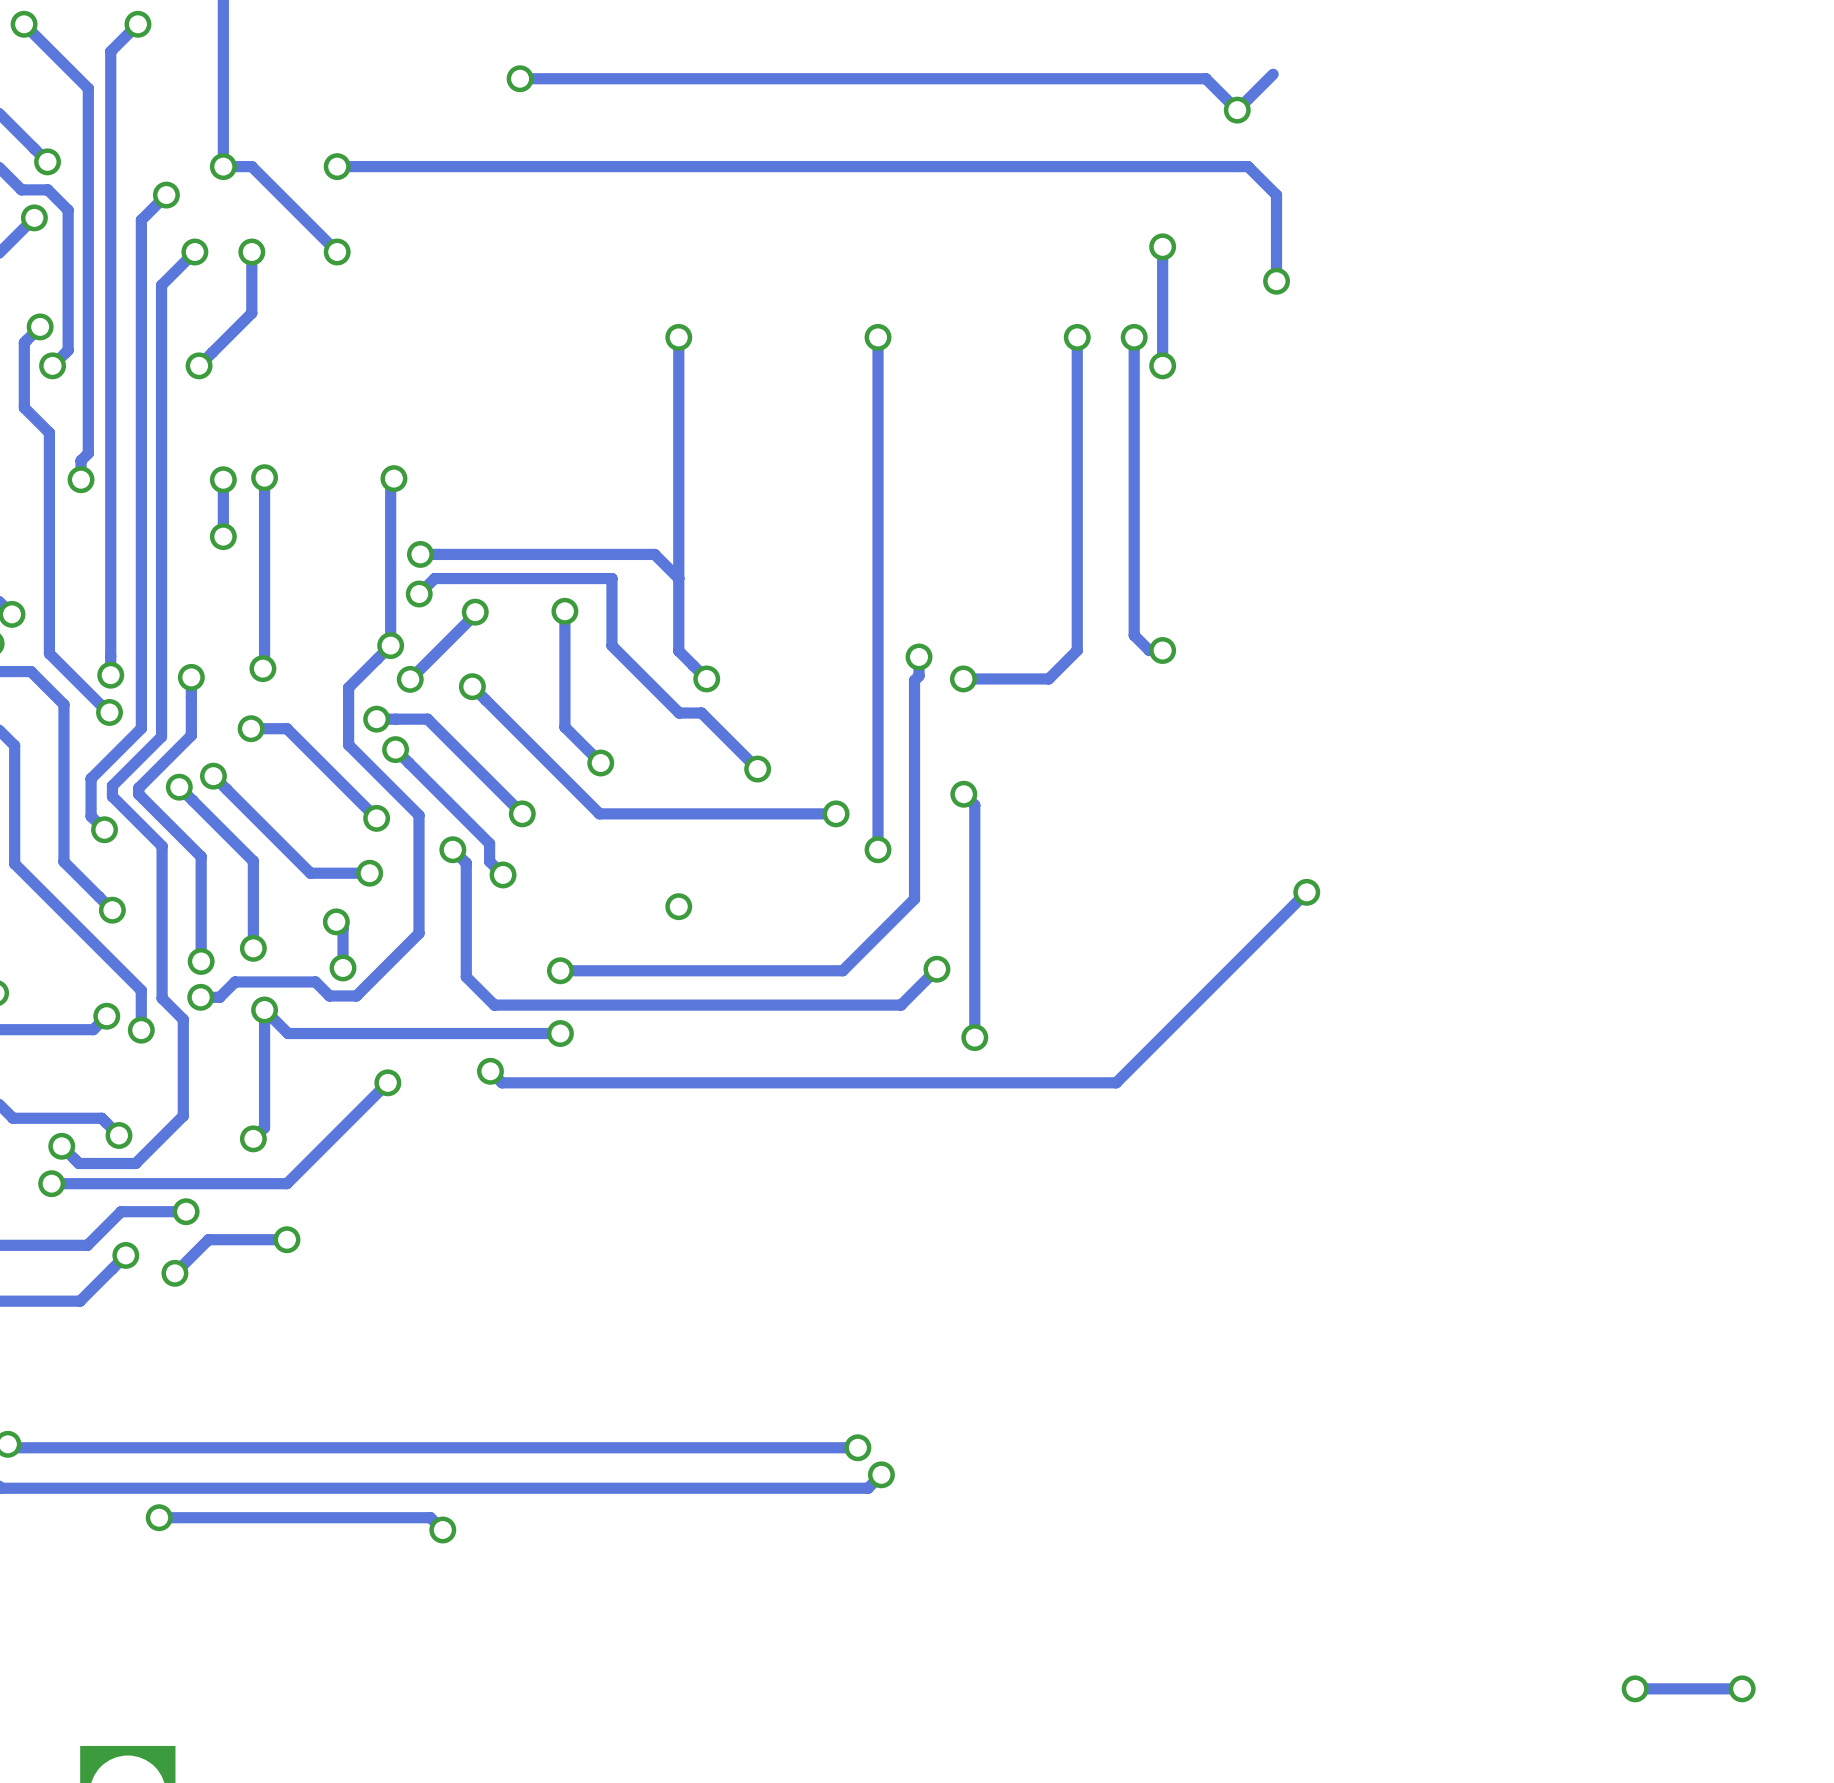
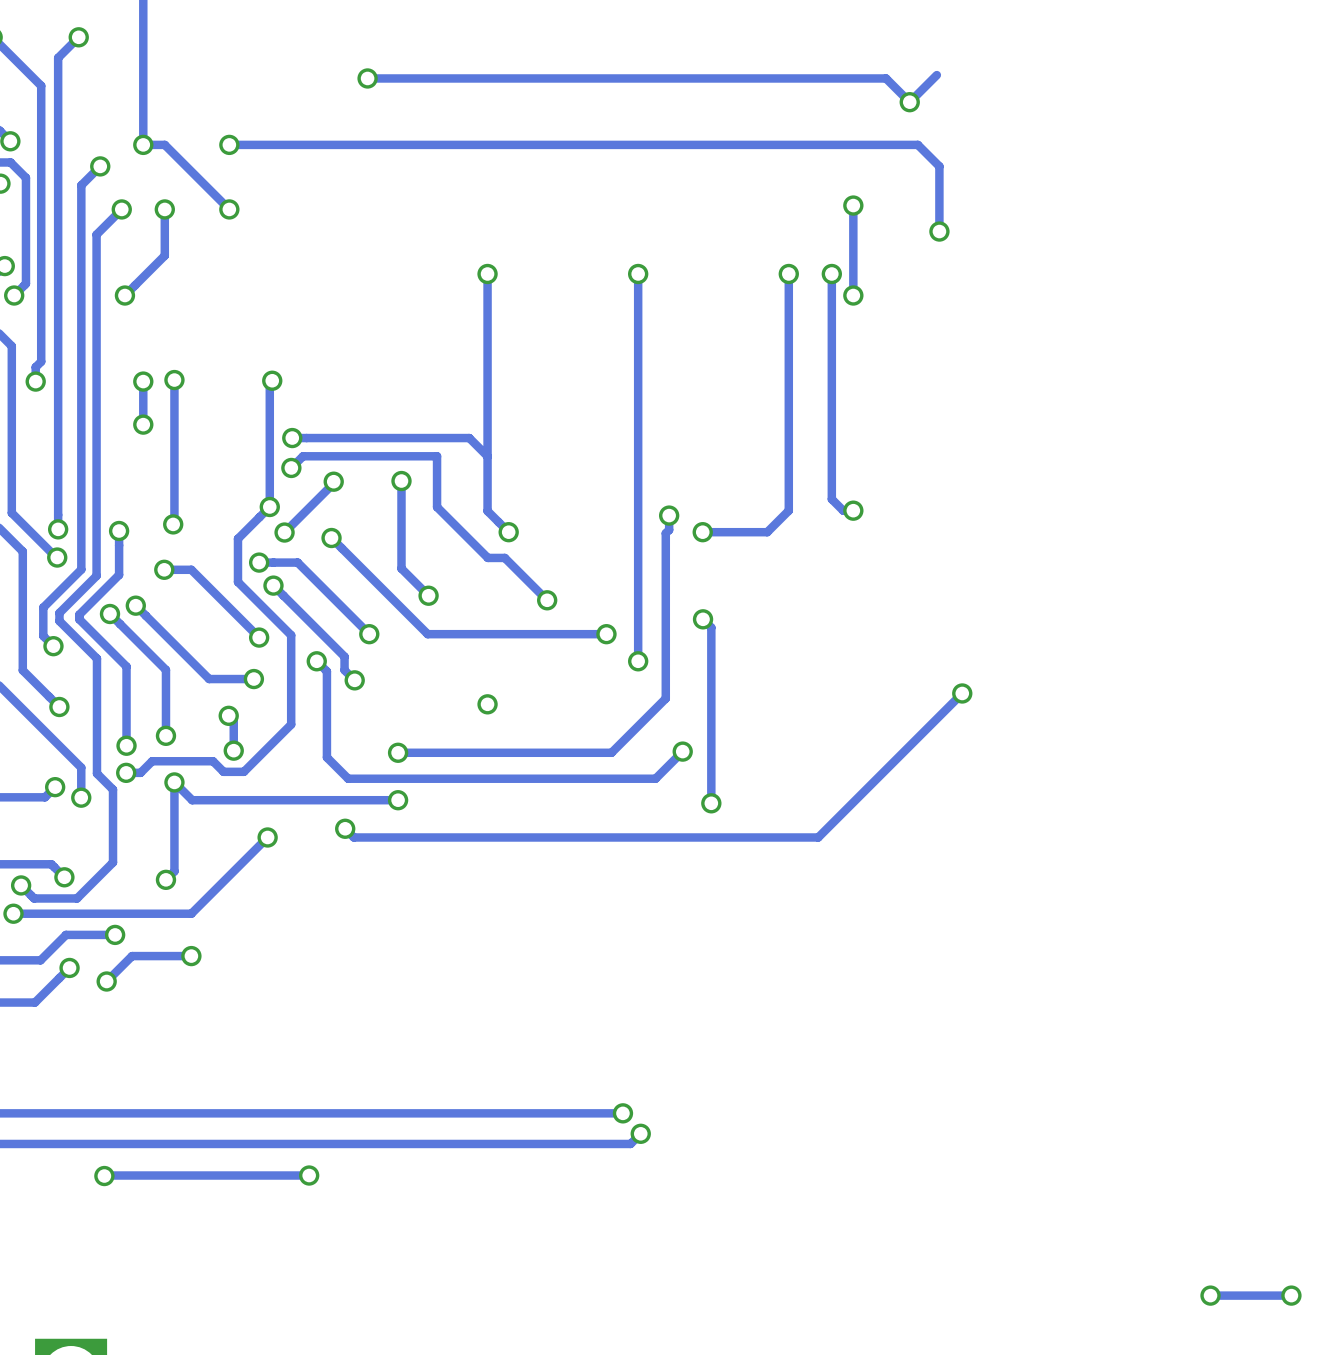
track: (159, 1517) (430, 1517) (442, 1529) -> (104, 1176) (309, 1175)
via position: (159, 1517) -> (104, 1176)

